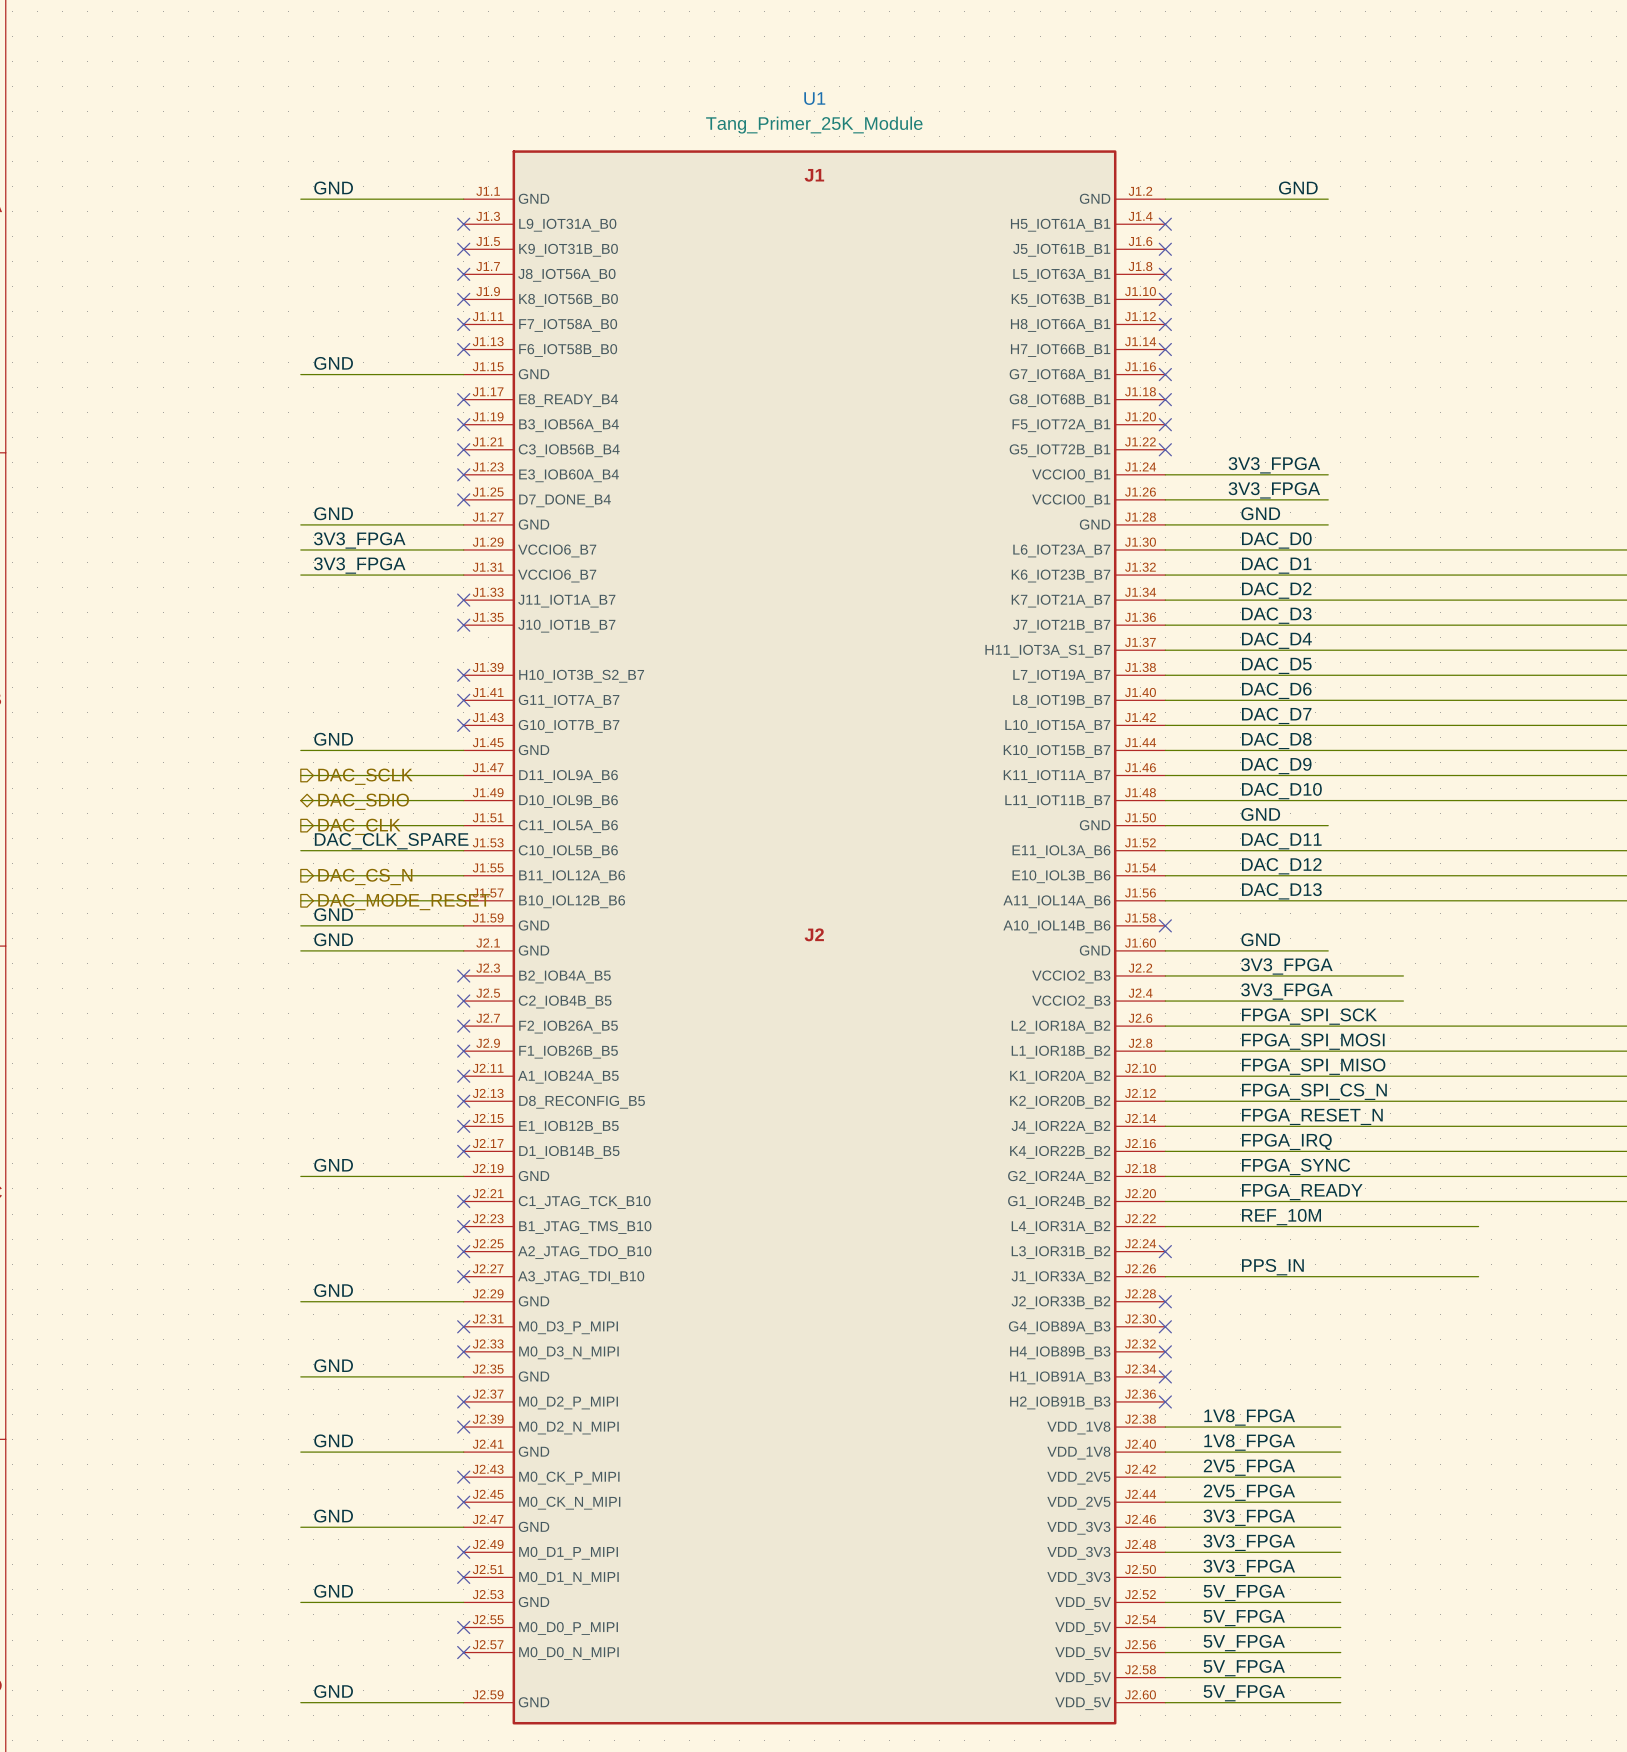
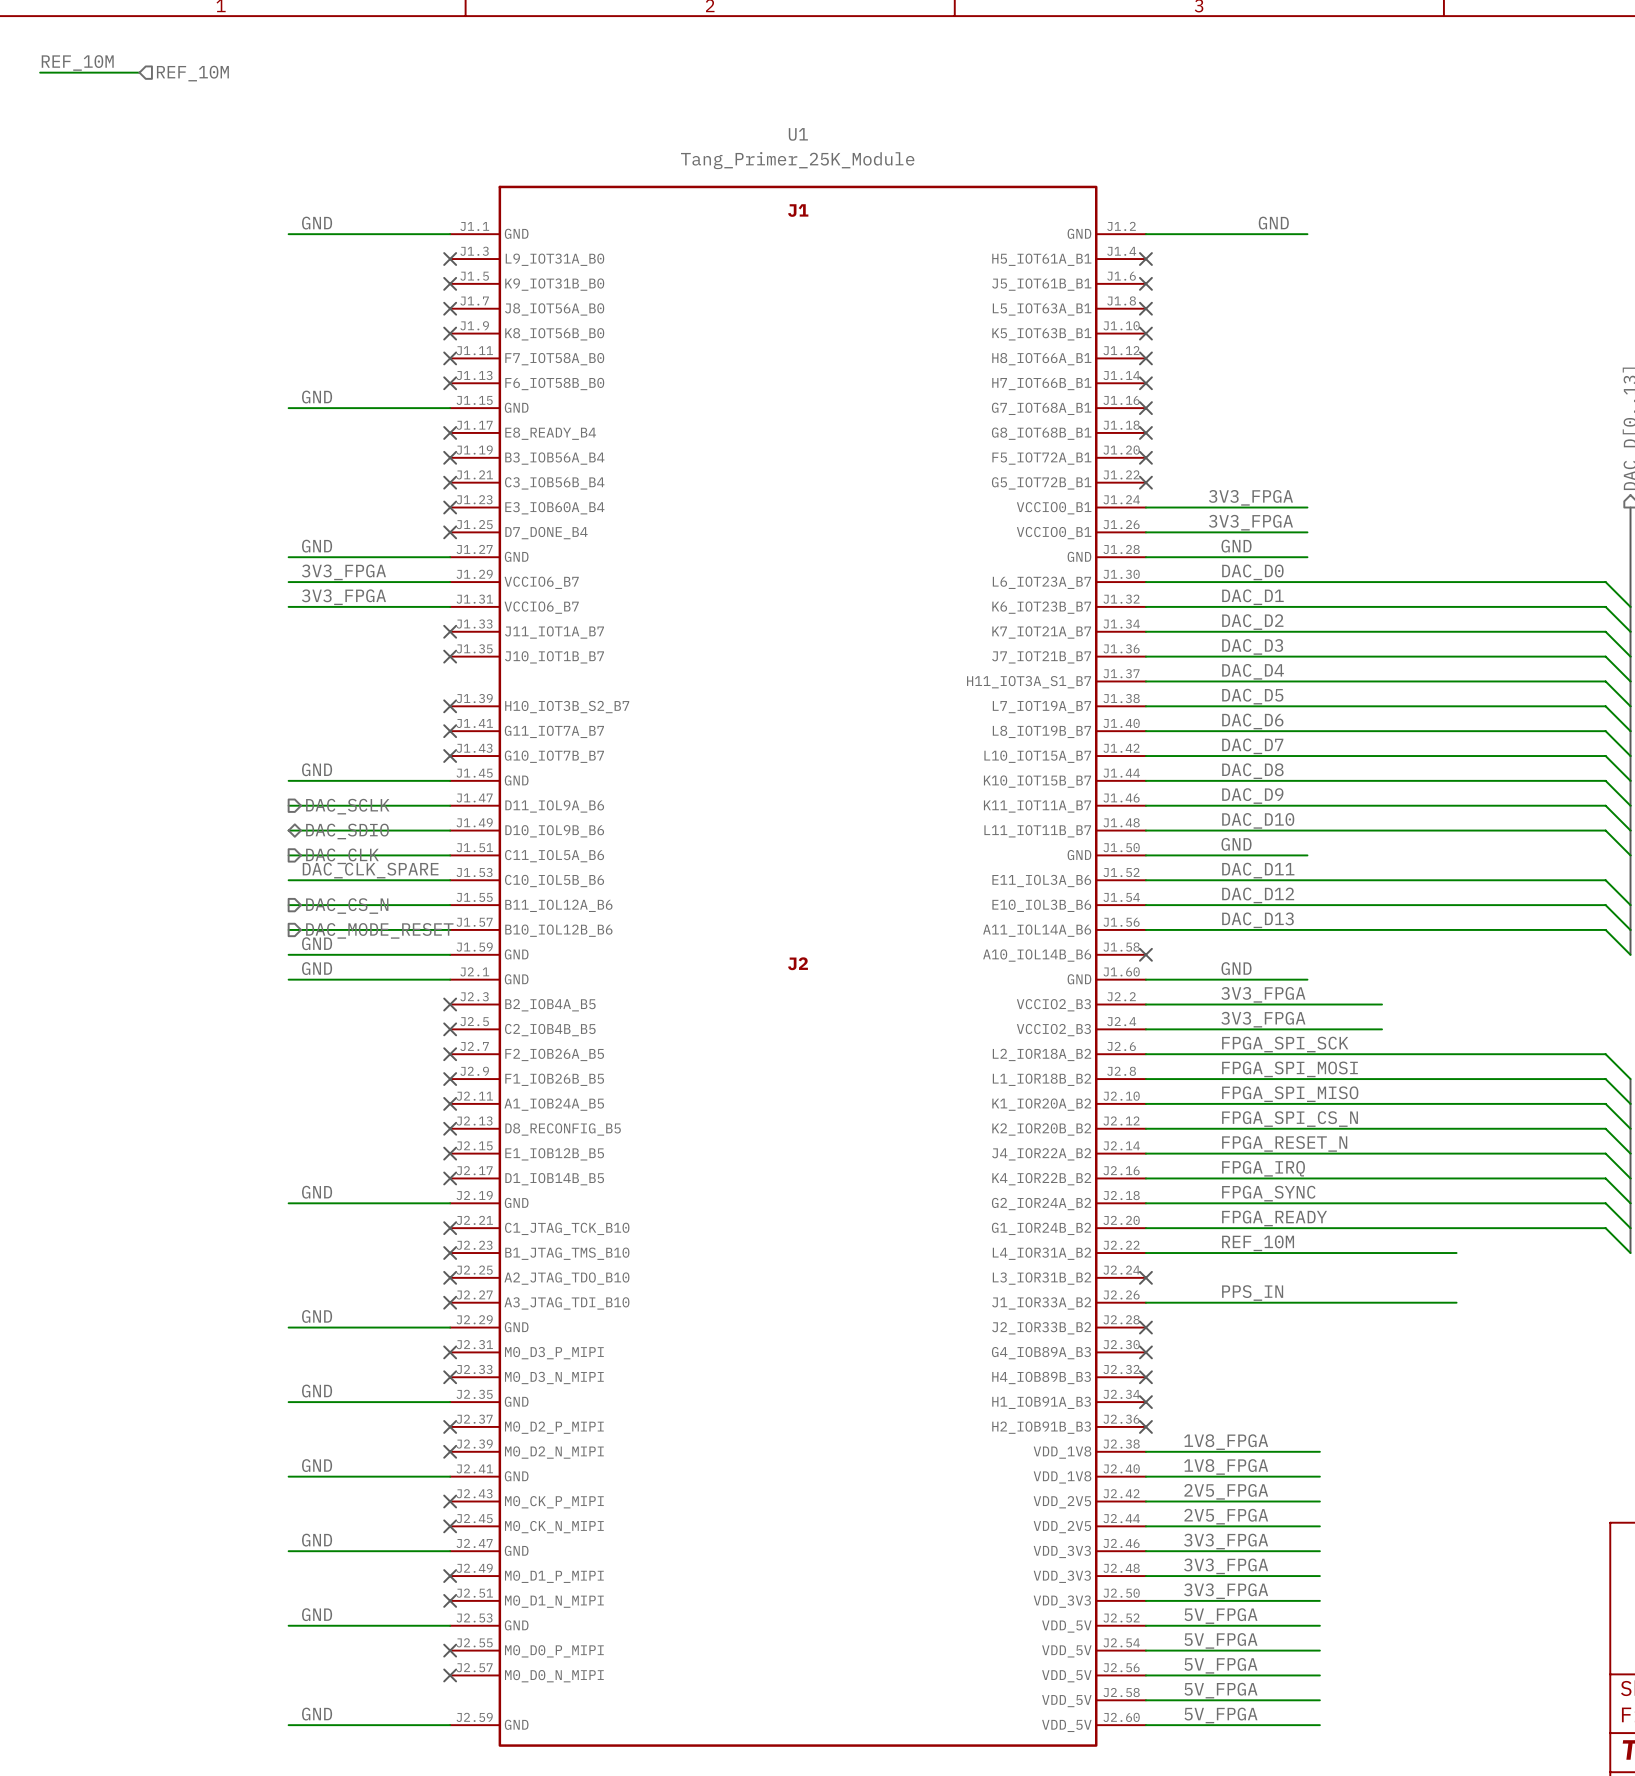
label: none -> REF_10M (77, 62)
wire: none -> (40, 72) (139, 72)
hierarchical label: none -> REF_10M (192, 73)

